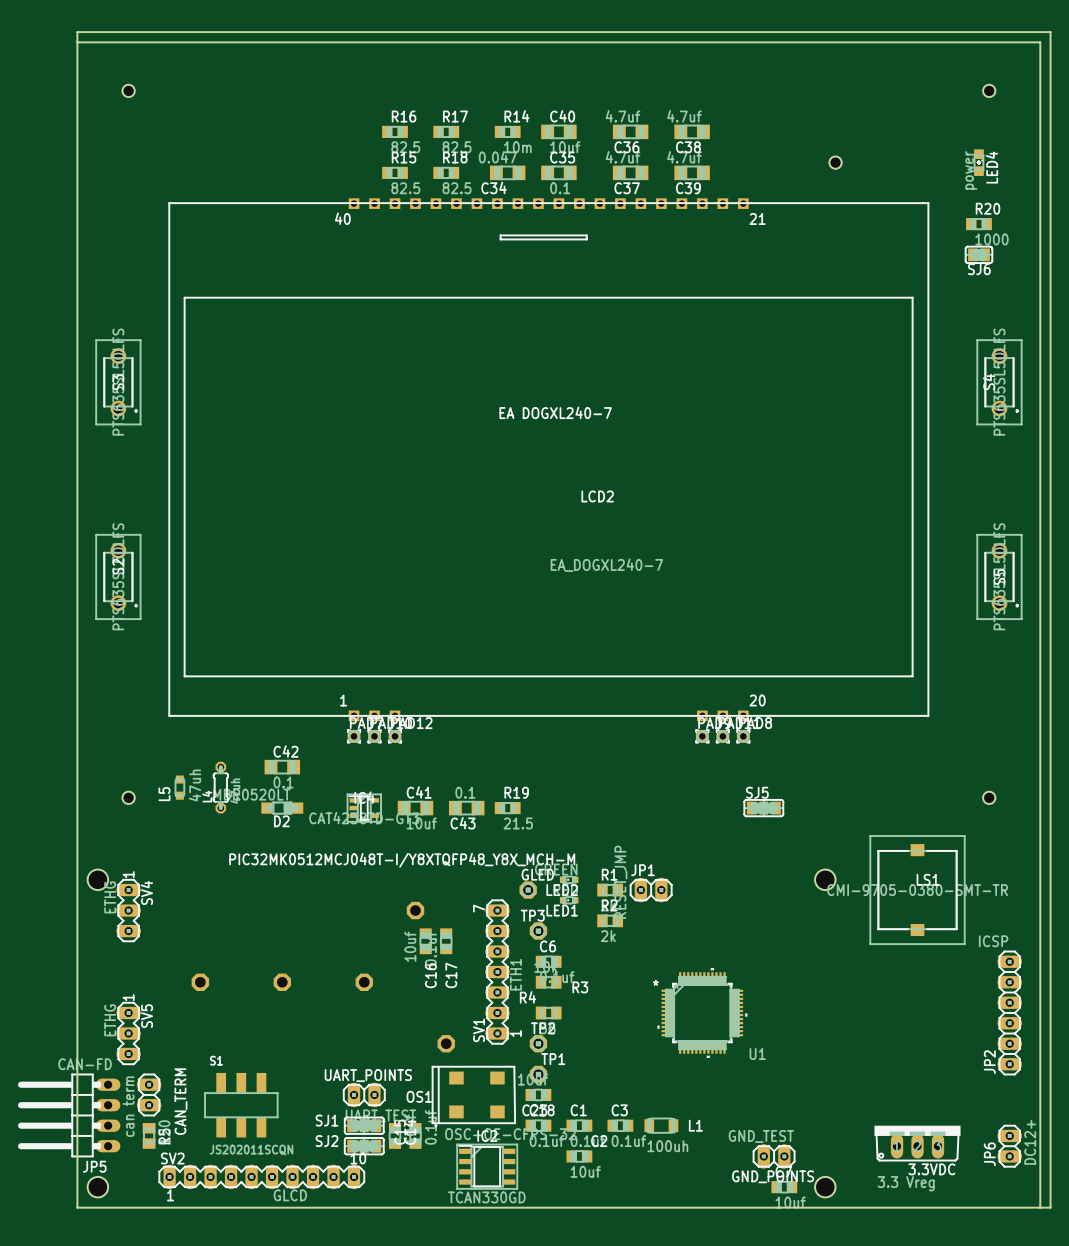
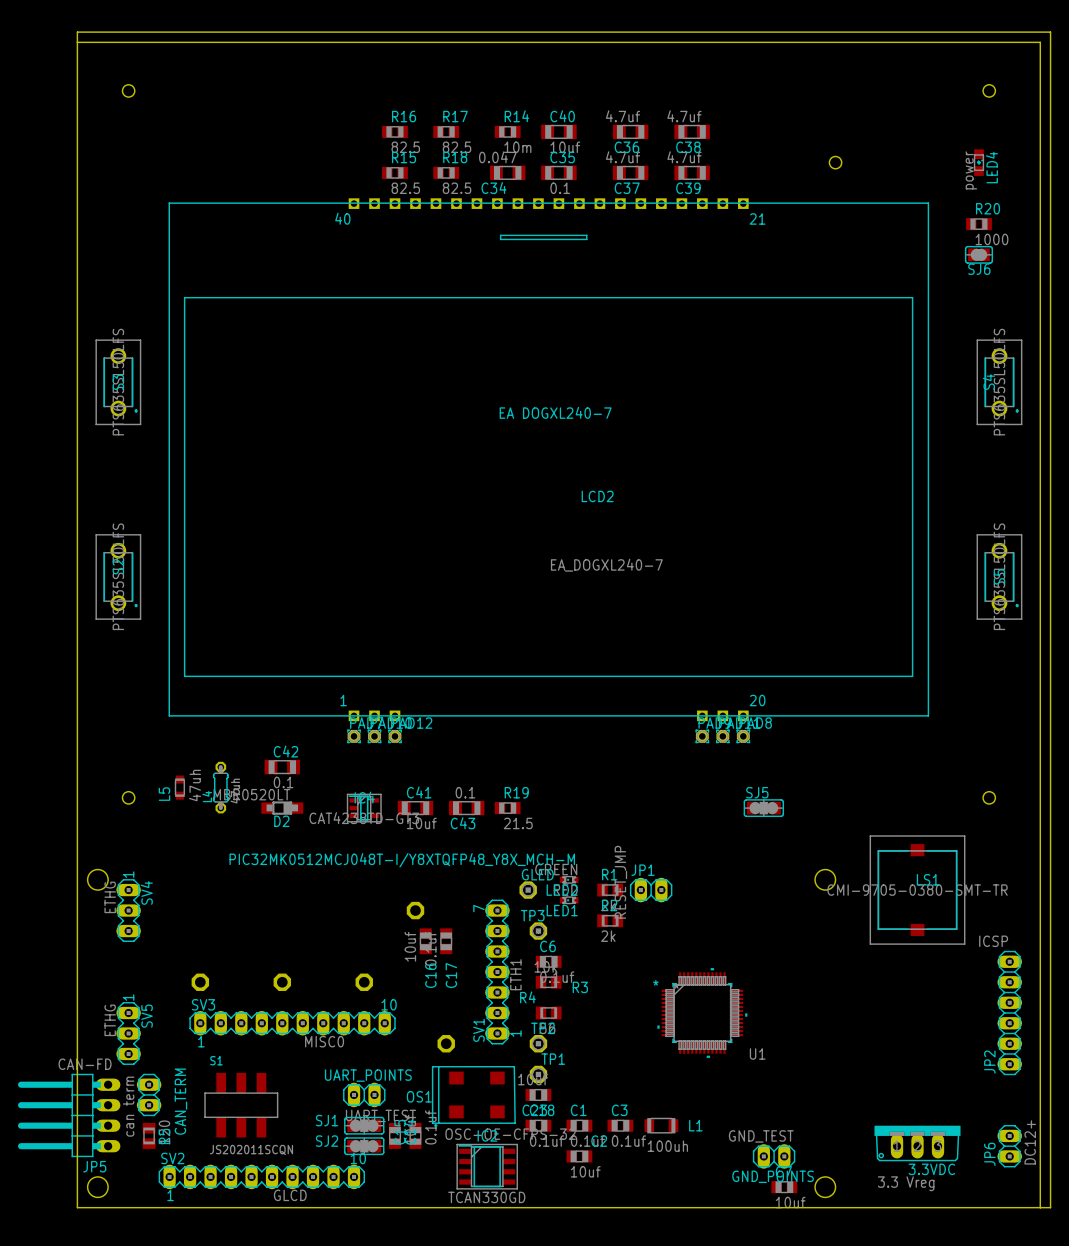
SV3: none -> MISC0 (292, 1023)

